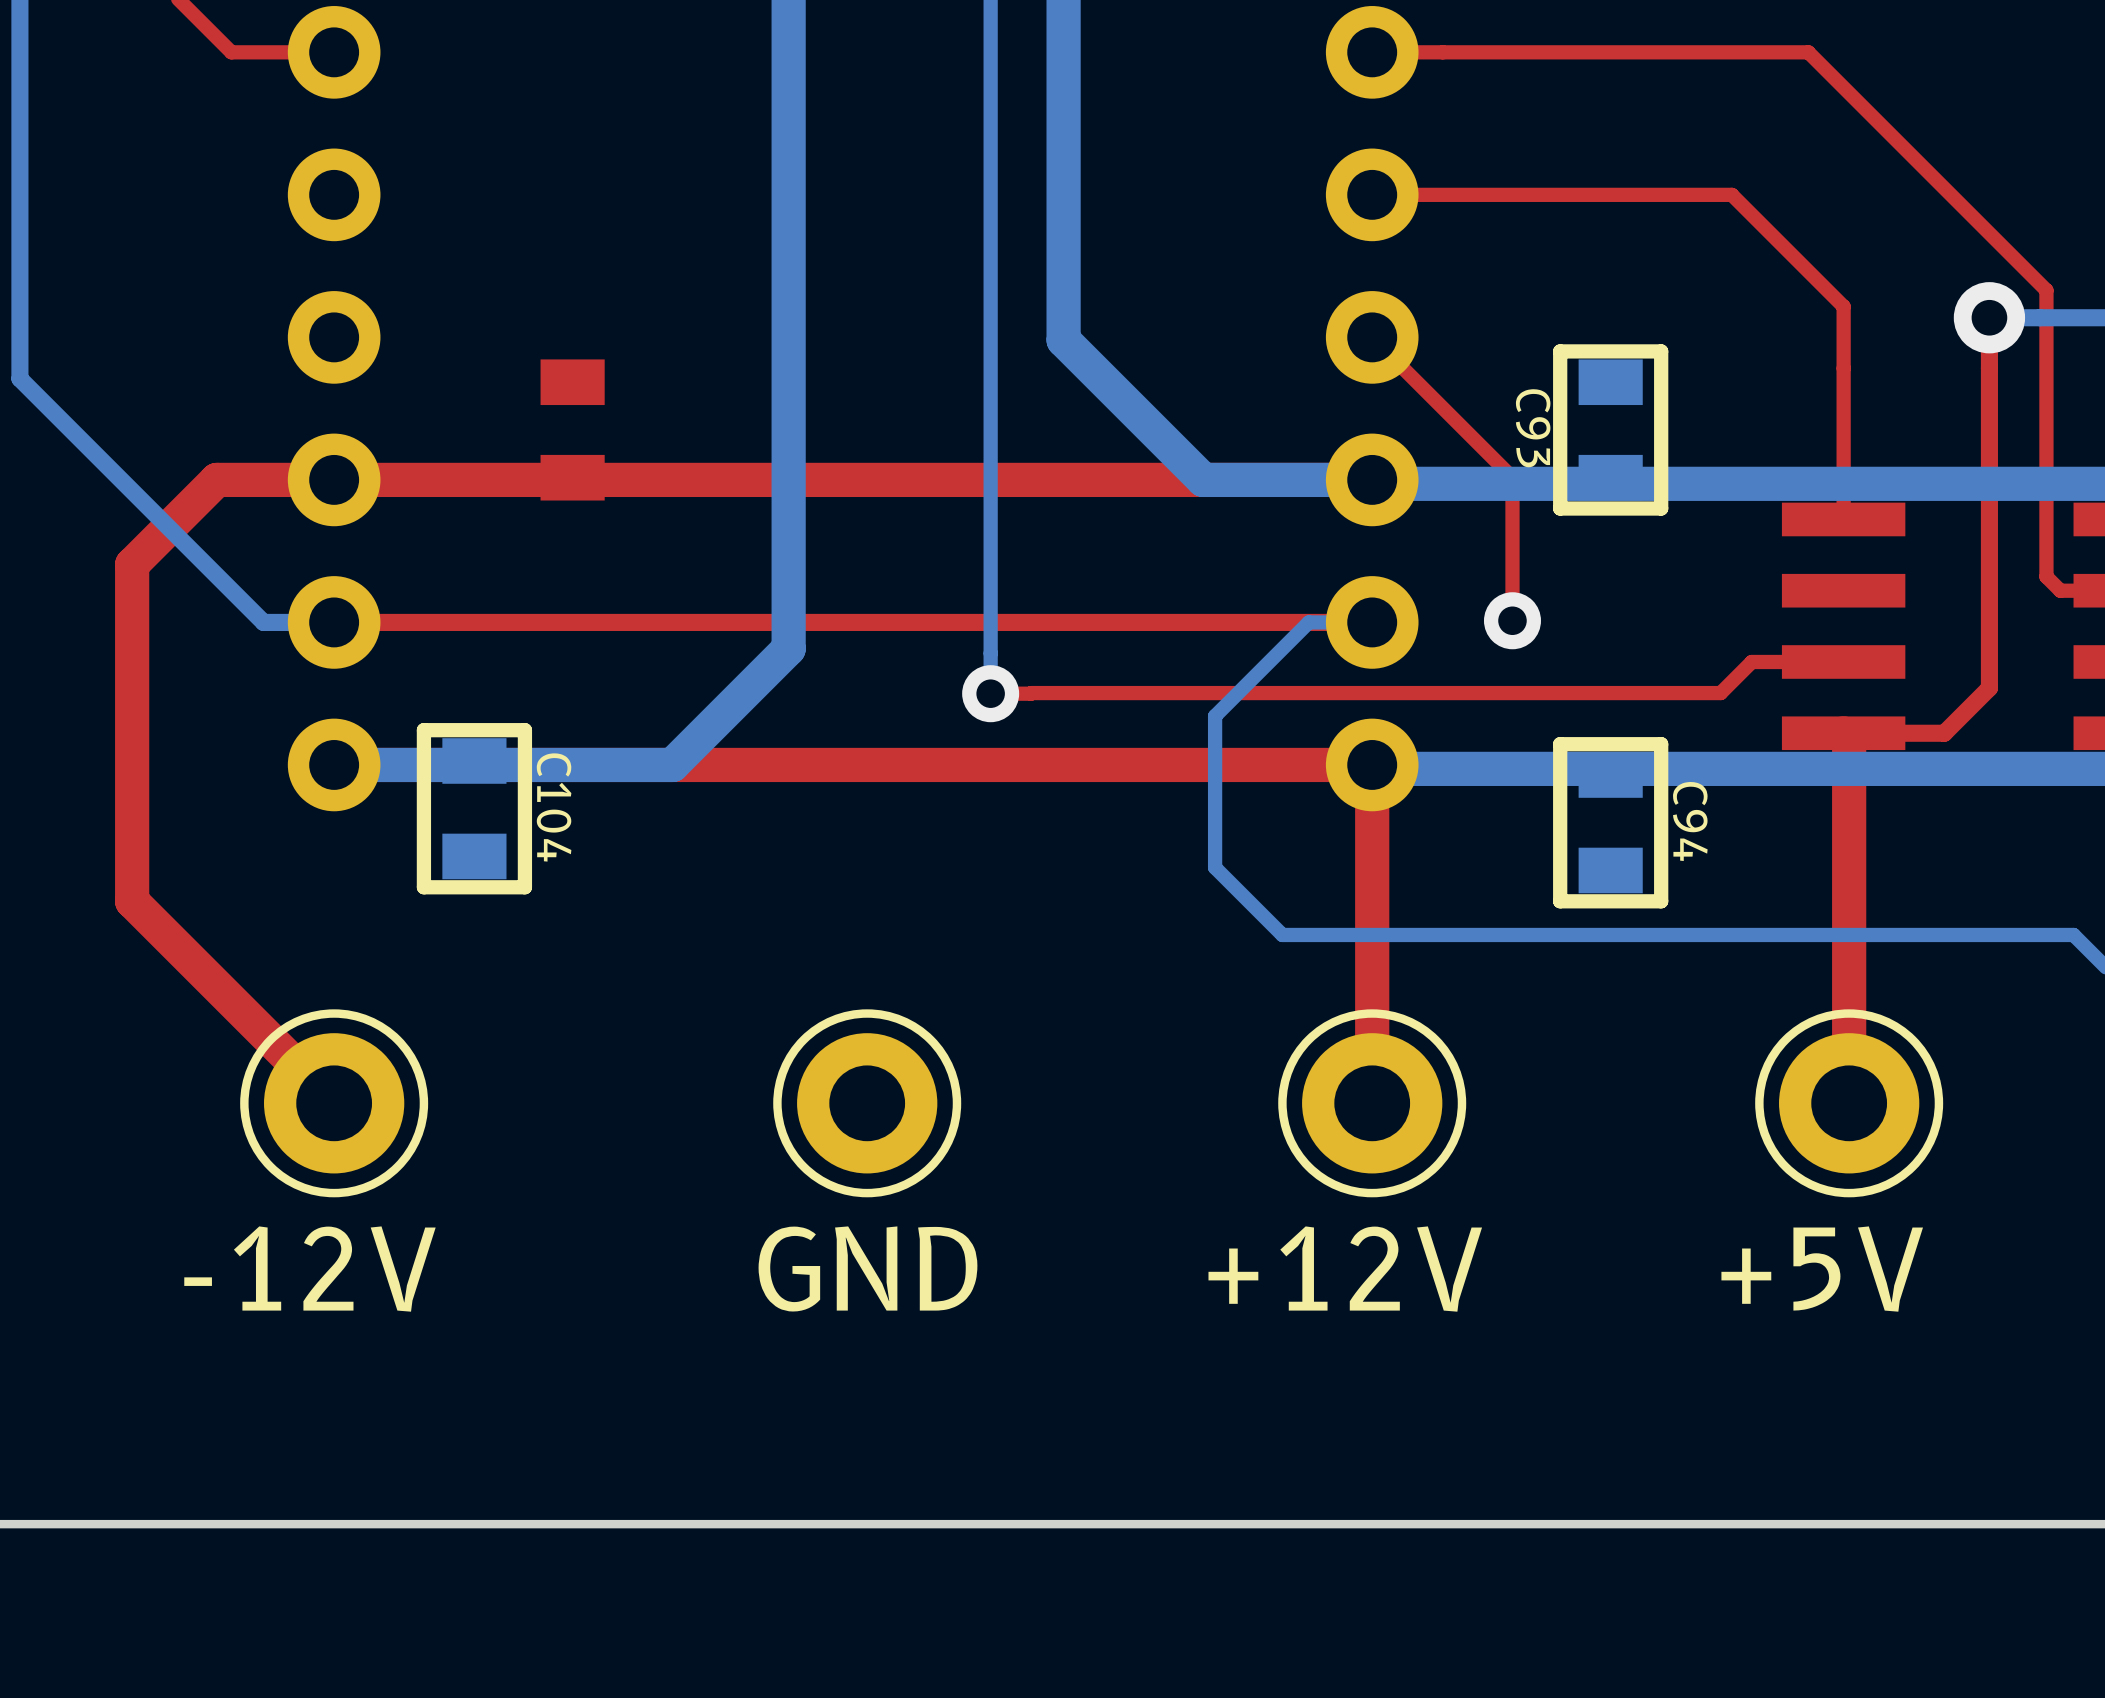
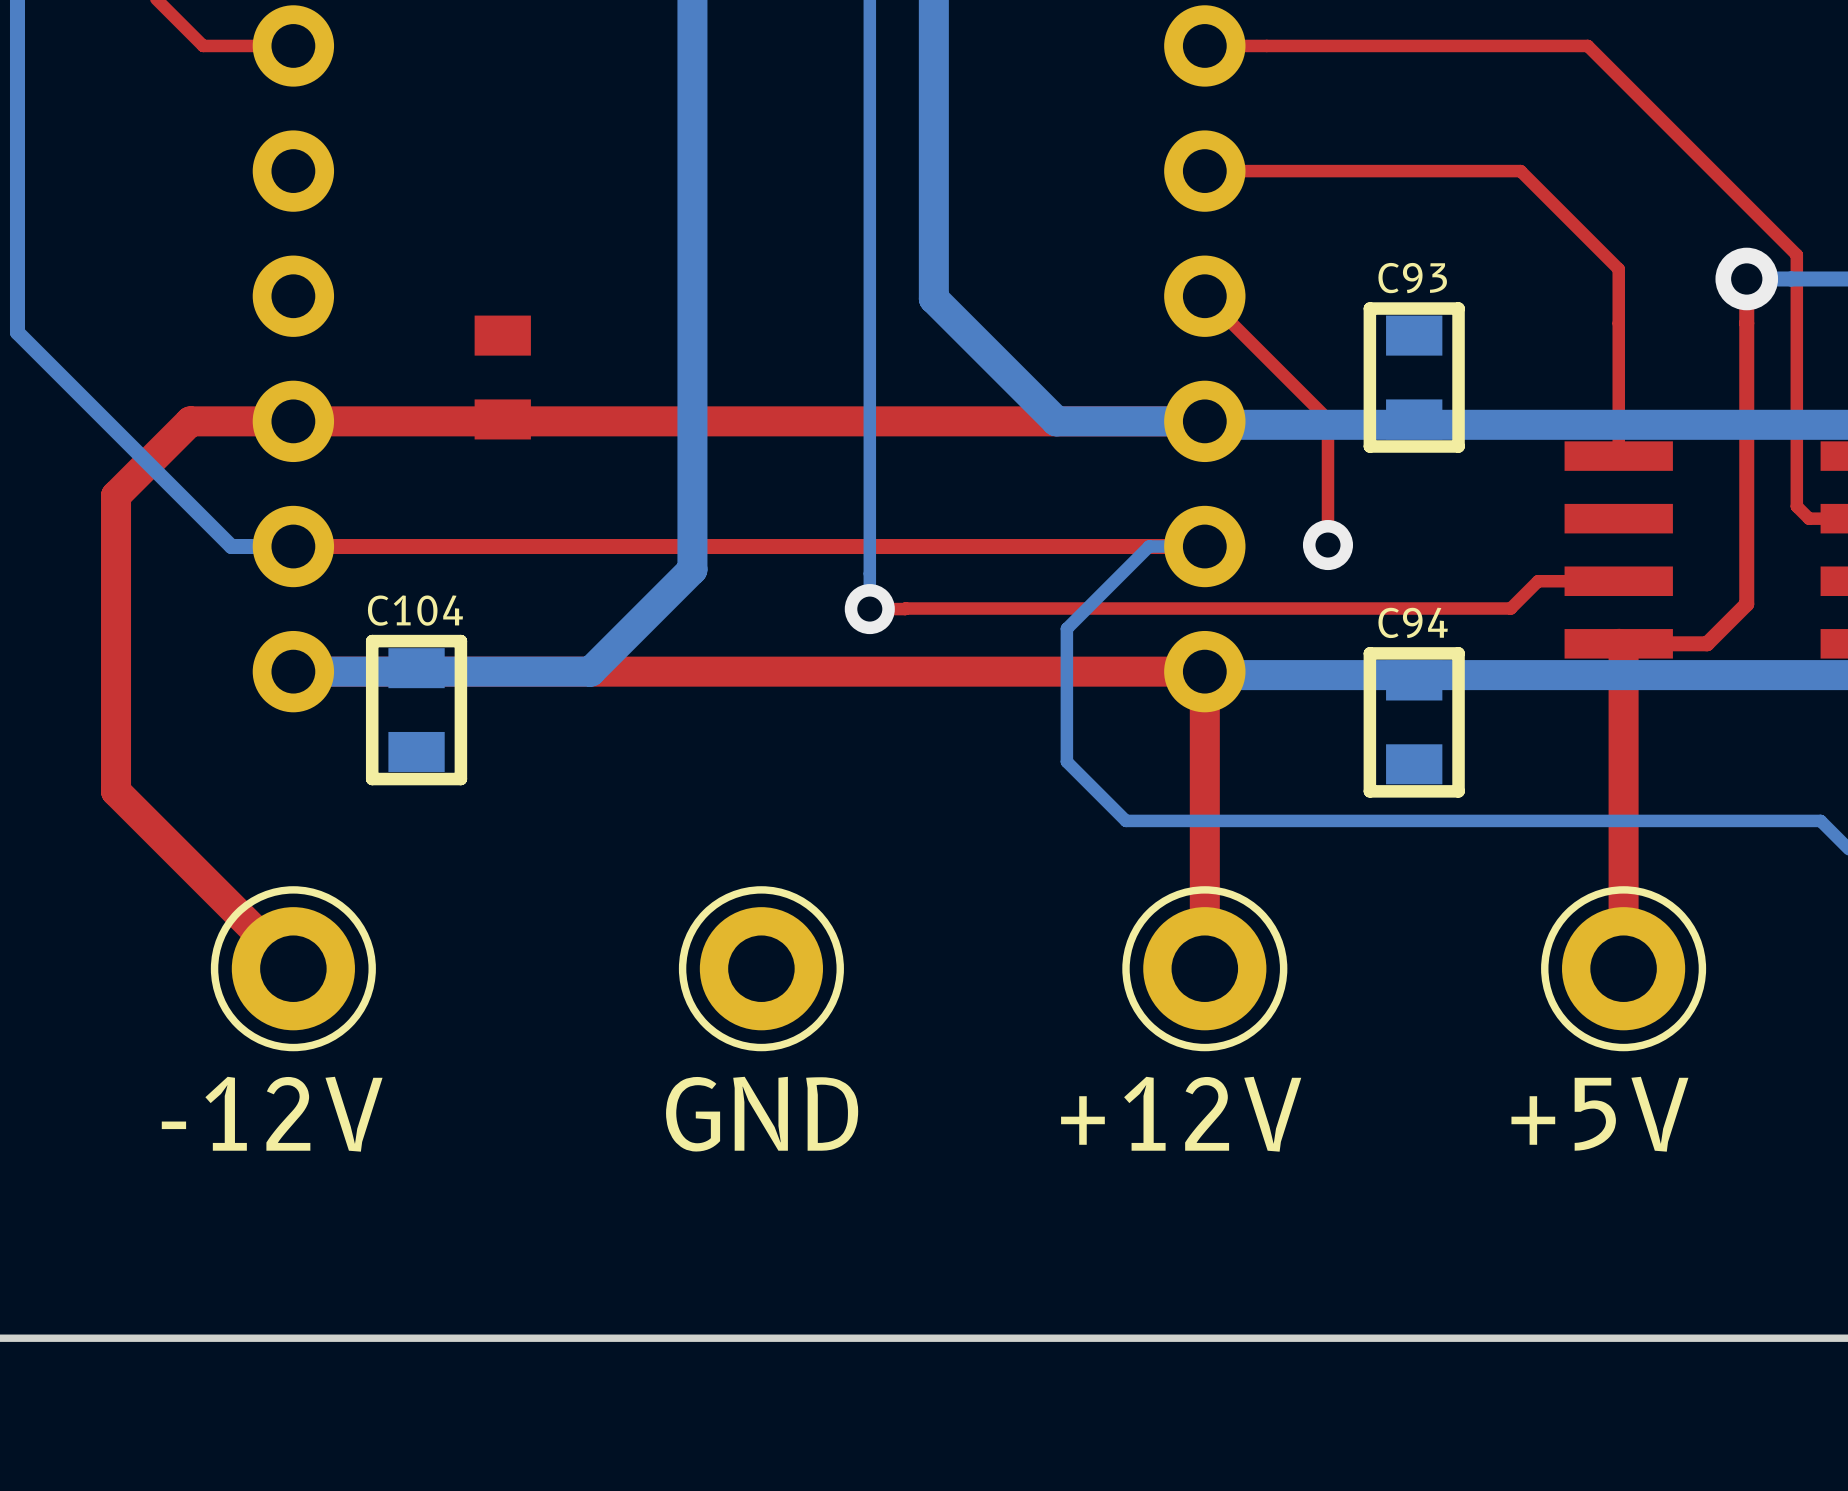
C93 name rotation: 0° (1533, 428) -> 90° counterclockwise (1412, 278)
C93 name position: C93 (1533, 428) -> C93 (1412, 278)
C104 name rotation: 0° (554, 807) -> 90° counterclockwise (415, 610)
C94 name rotation: 0° (1690, 821) -> 90° counterclockwise (1413, 622)
C94 name position: C94 (1690, 821) -> C94 (1413, 622)

